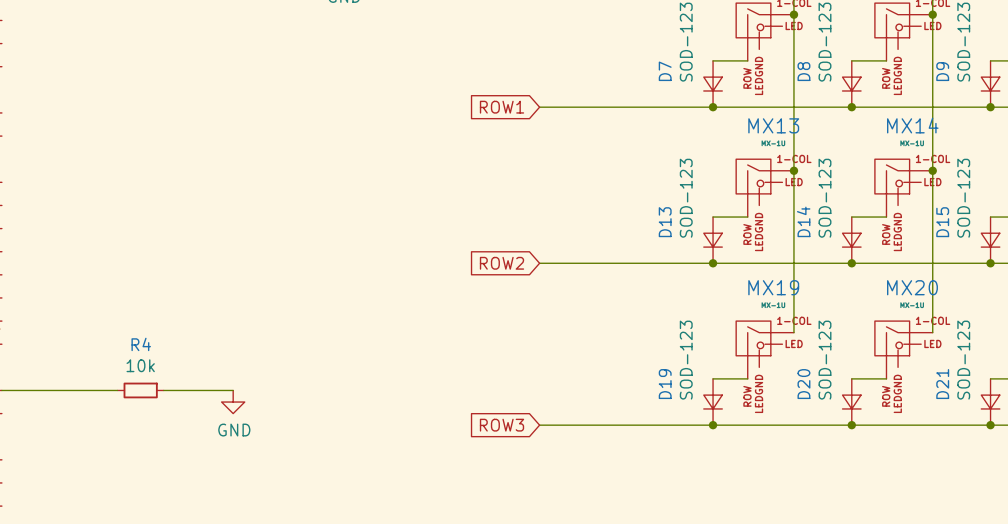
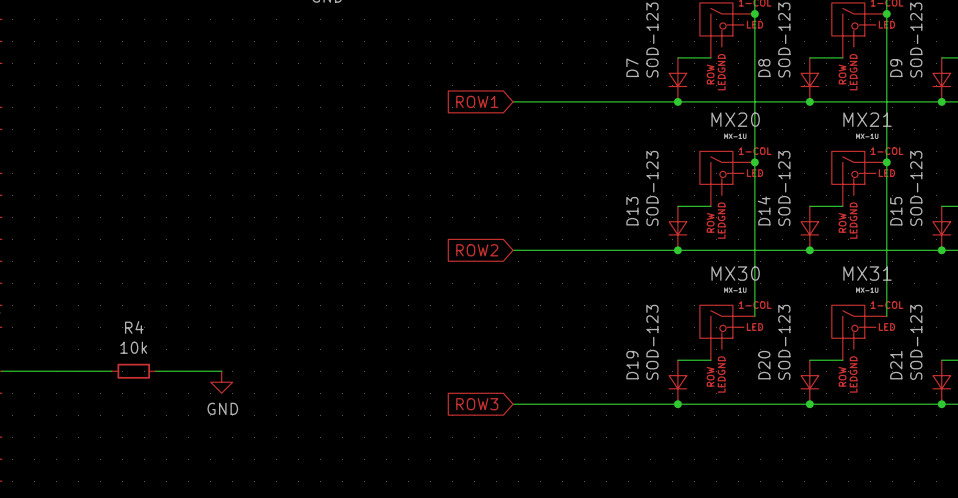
MX13 name: MX13 (773, 125) -> MX20 (735, 119)
MX14 name: MX14 (912, 125) -> MX21 (867, 119)
MX19 name: MX19 (773, 287) -> MX30 (735, 273)
MX20 name: MX20 (912, 287) -> MX31 (867, 273)

